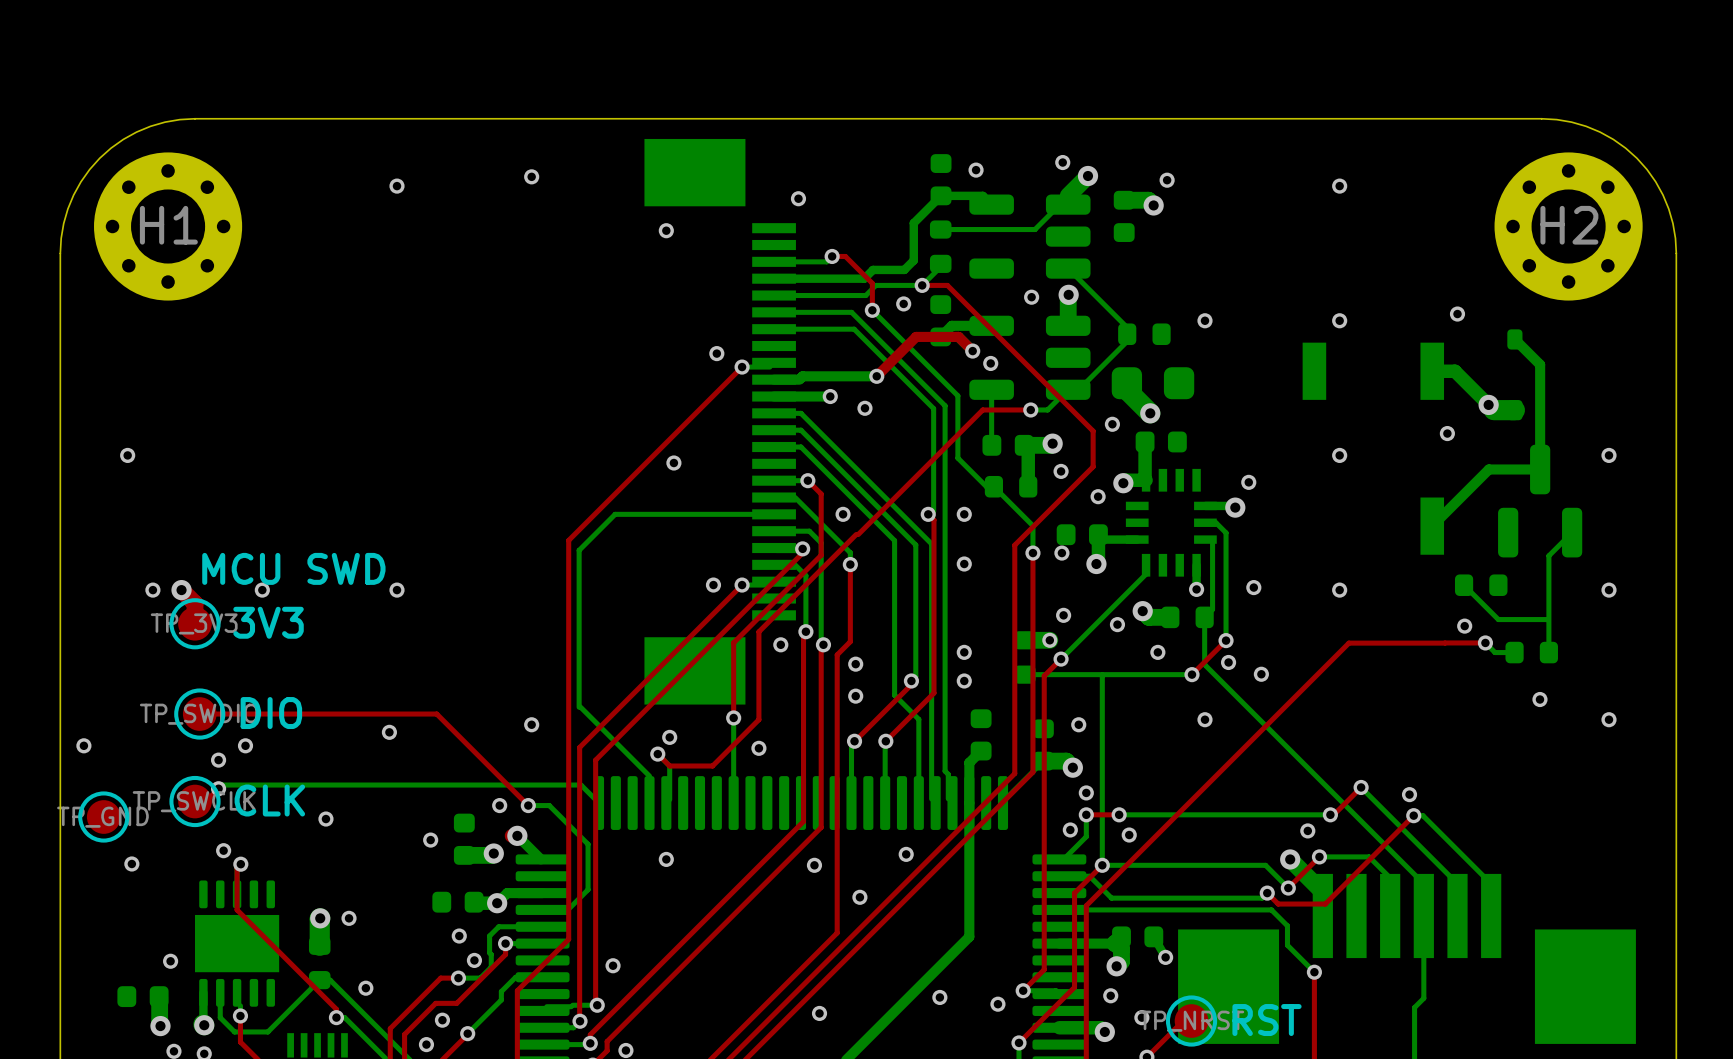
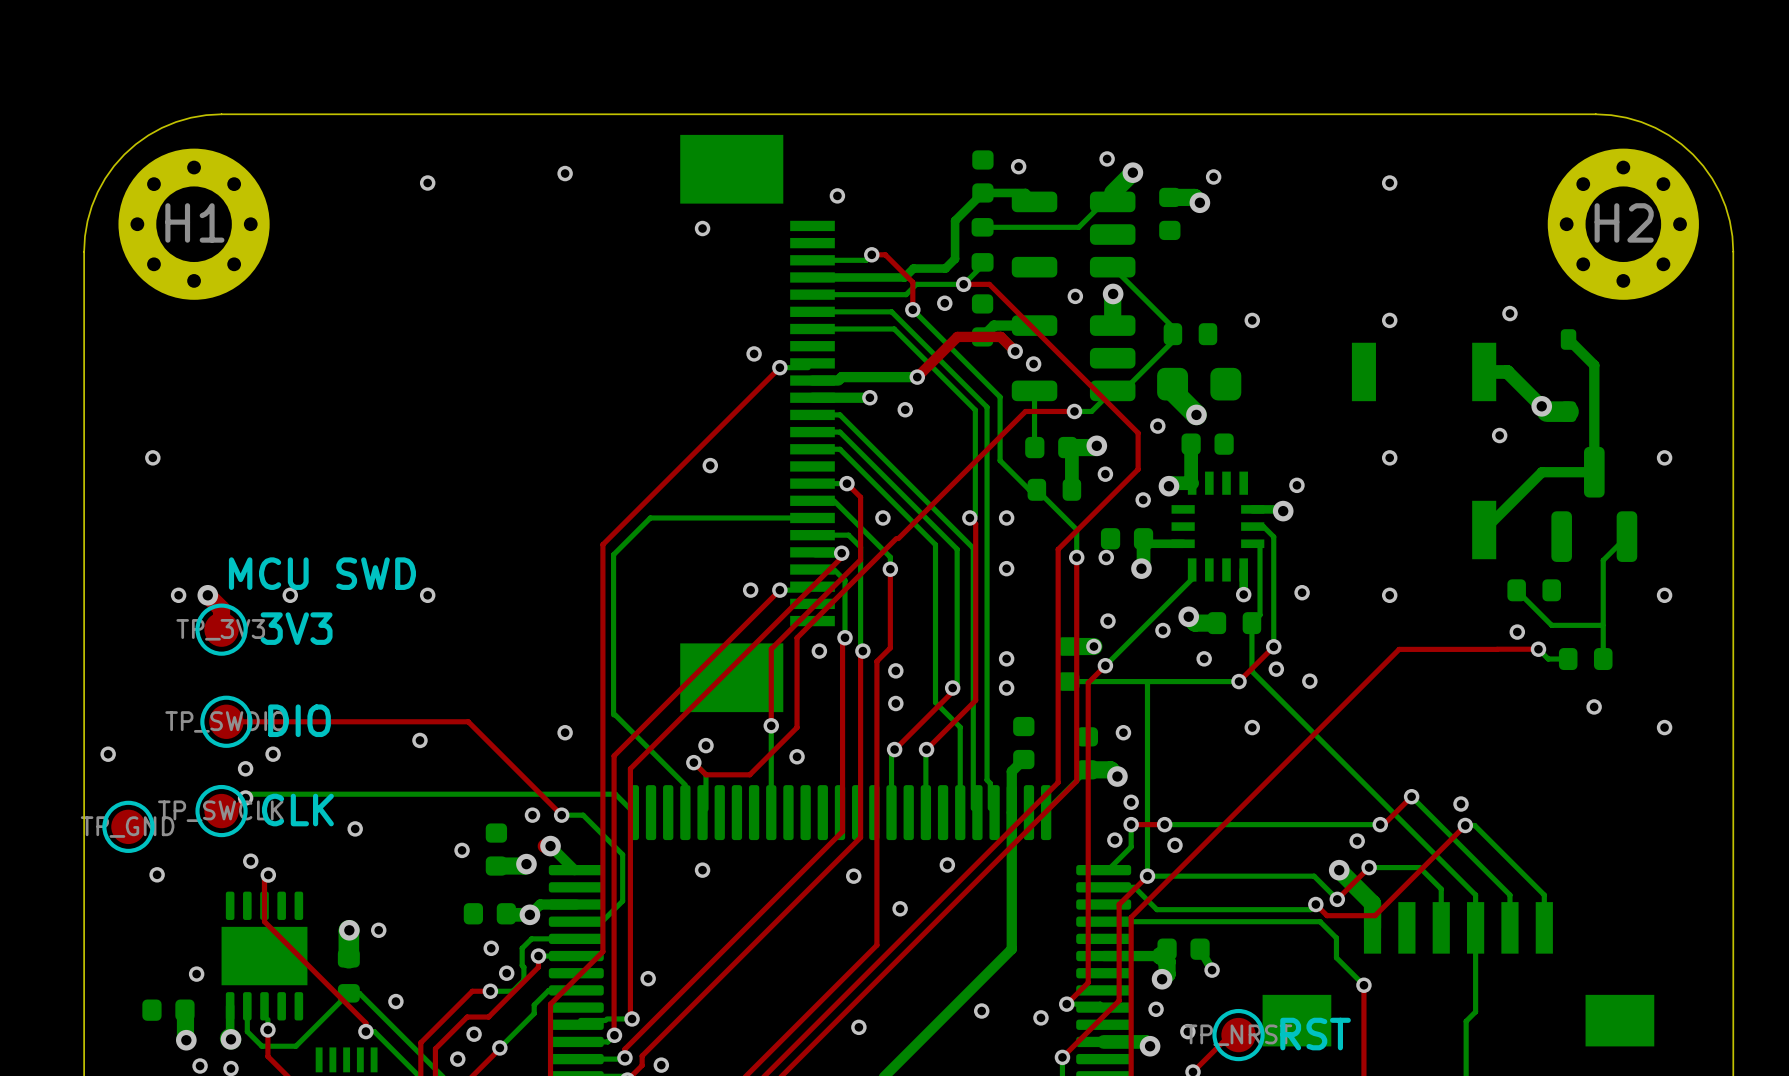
part footprint: [1178, 873, 1636, 1044] -> [1262, 902, 1655, 1047]

